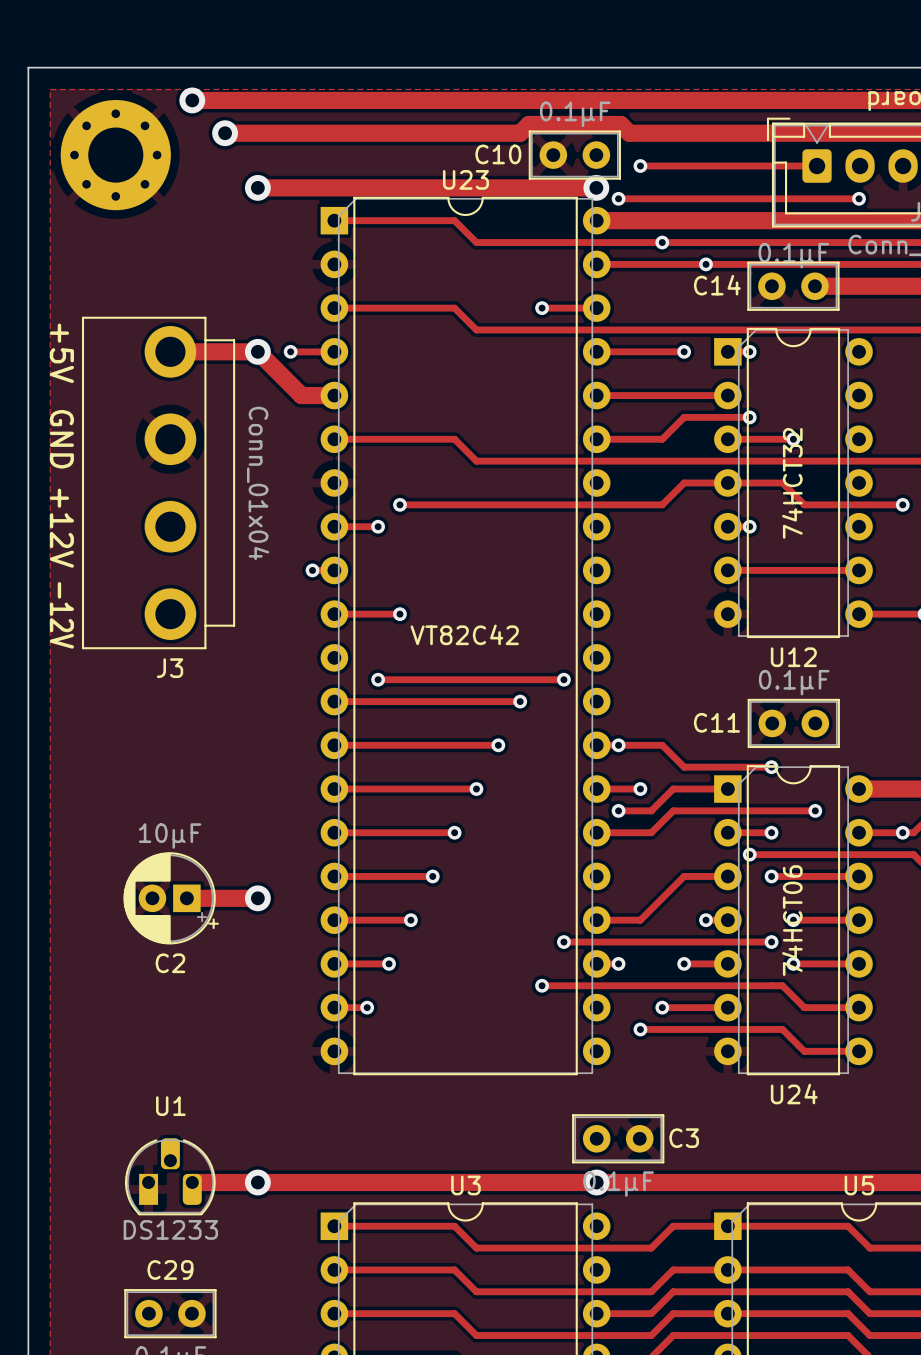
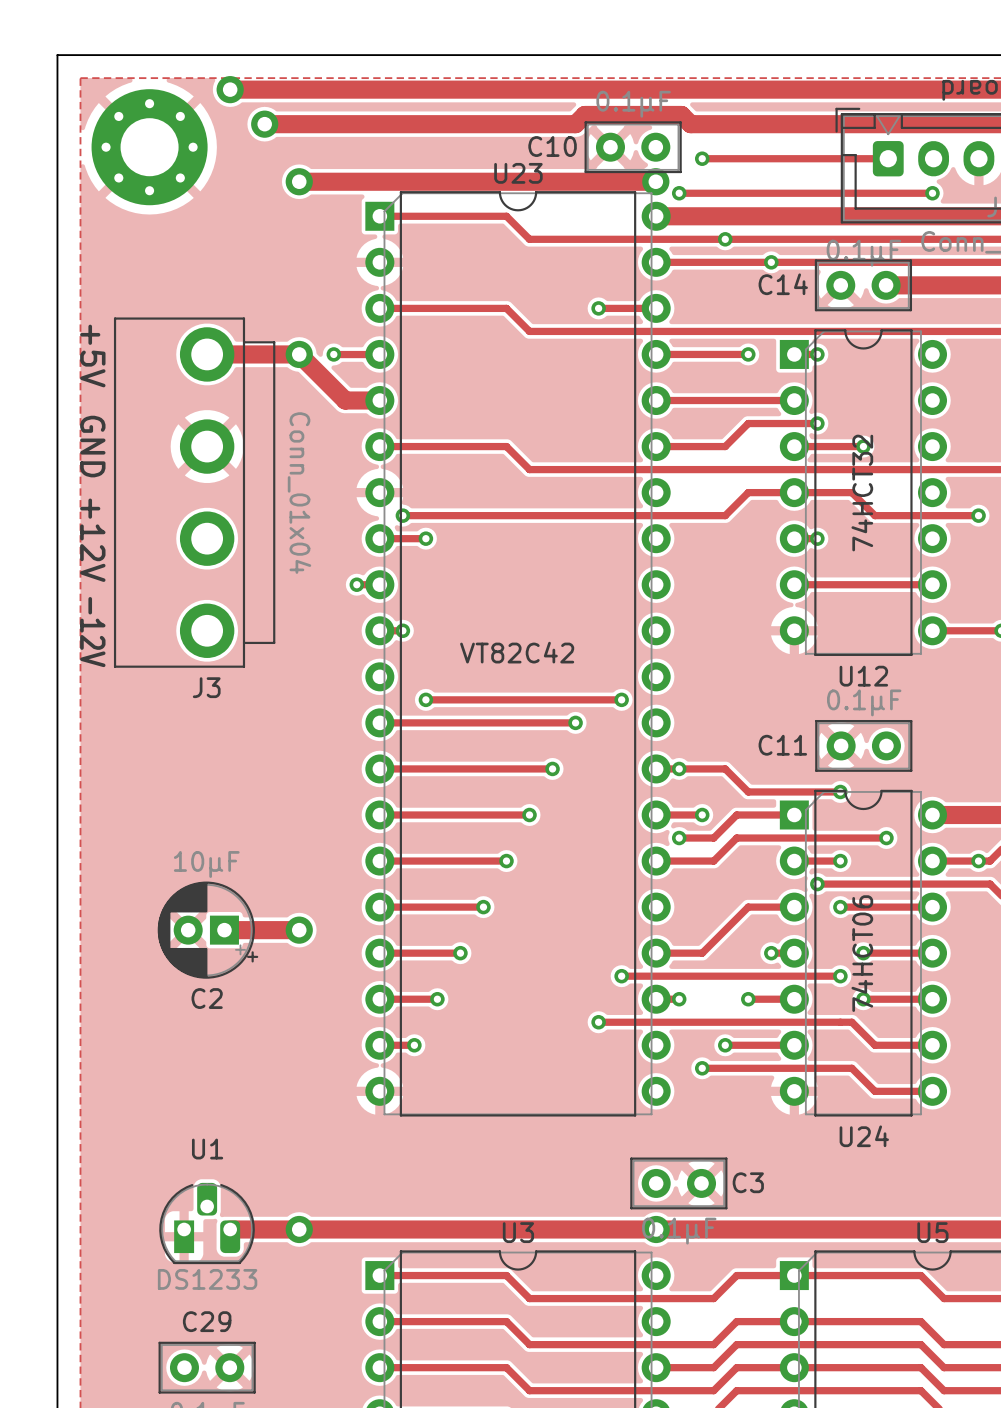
via position: (399, 504) -> (402, 515)
track: (356, 614) (399, 614) -> (402, 515) (448, 515)
via position: (399, 614) -> (402, 630)

